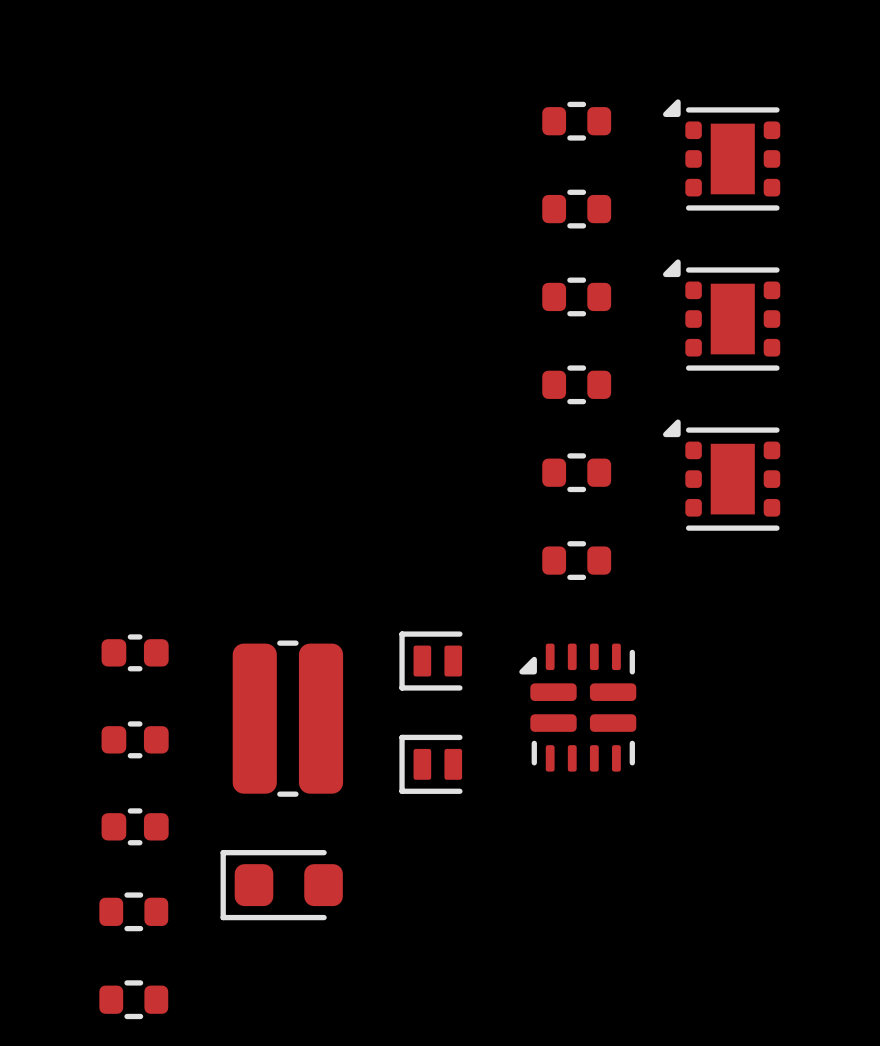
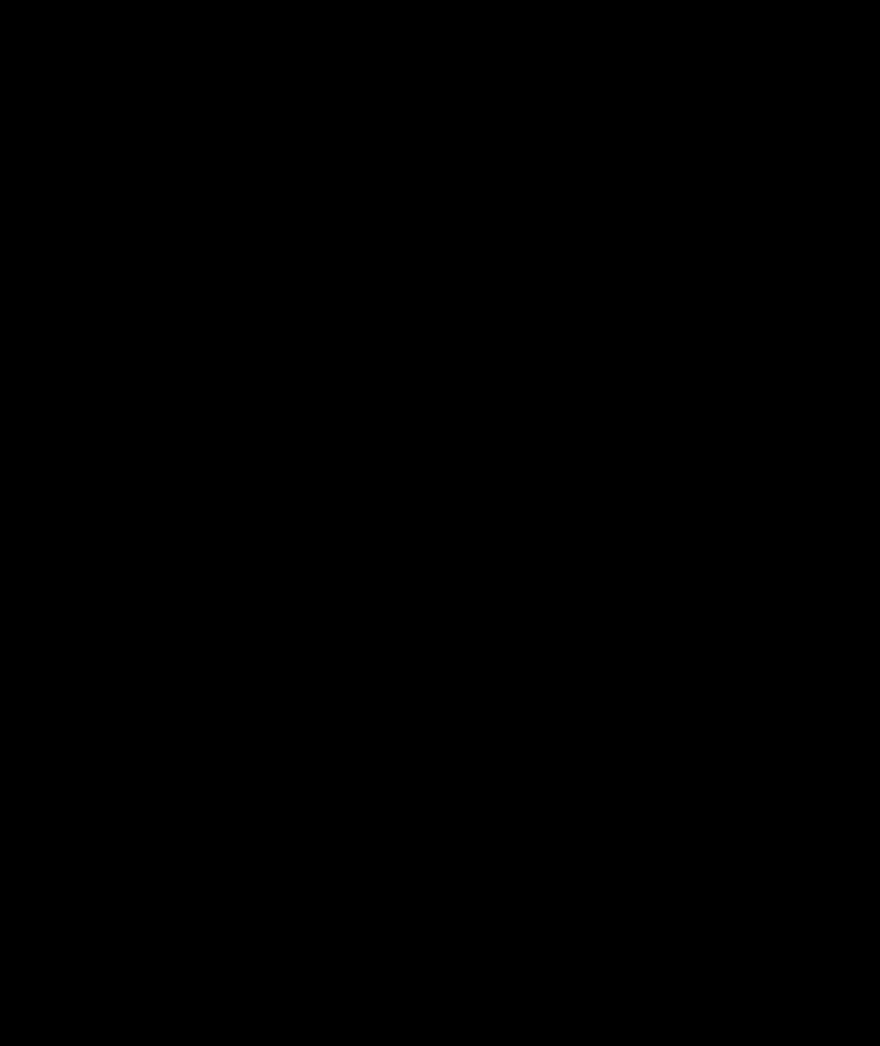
part: (576, 121) -> none
part: (721, 154) -> none
part: (576, 209) -> none
part: (576, 296) -> none
part: (721, 315) -> none
part: (576, 384) -> none
part: (576, 472) -> none
part: (721, 475) -> none
part: (576, 560) -> none
part: (135, 652) -> none
part: (430, 661) -> none
part: (577, 707) -> none
part: (287, 718) -> none
part: (135, 739) -> none
part: (430, 764) -> none
part: (135, 826) -> none
part: (281, 885) -> none
part: (133, 911) -> none
part: (133, 999) -> none

